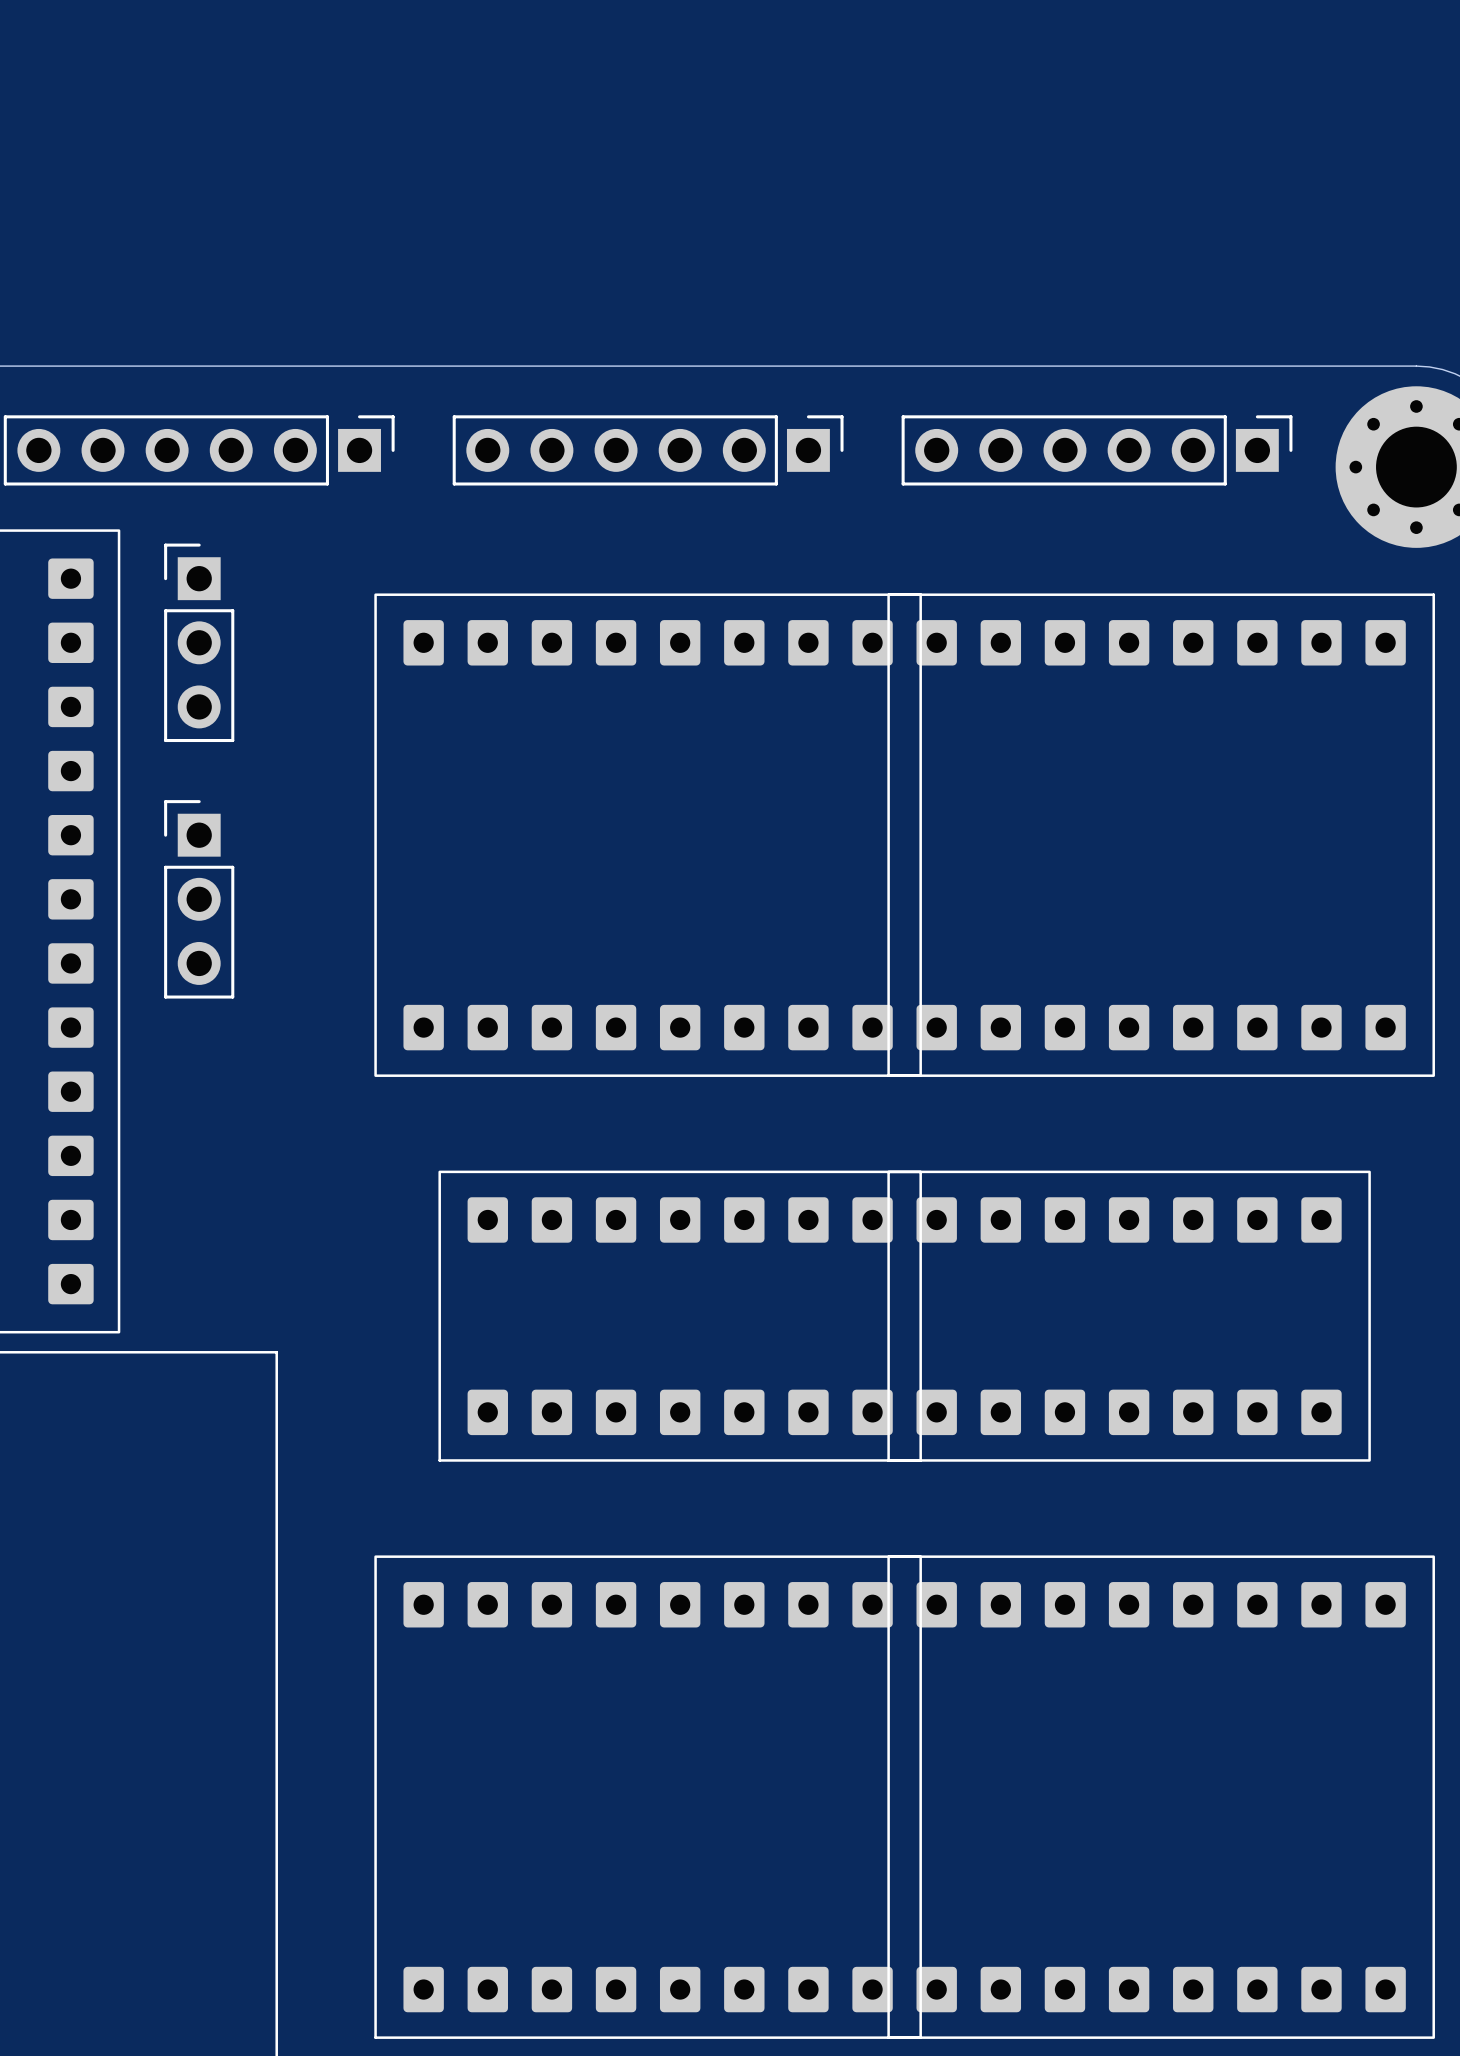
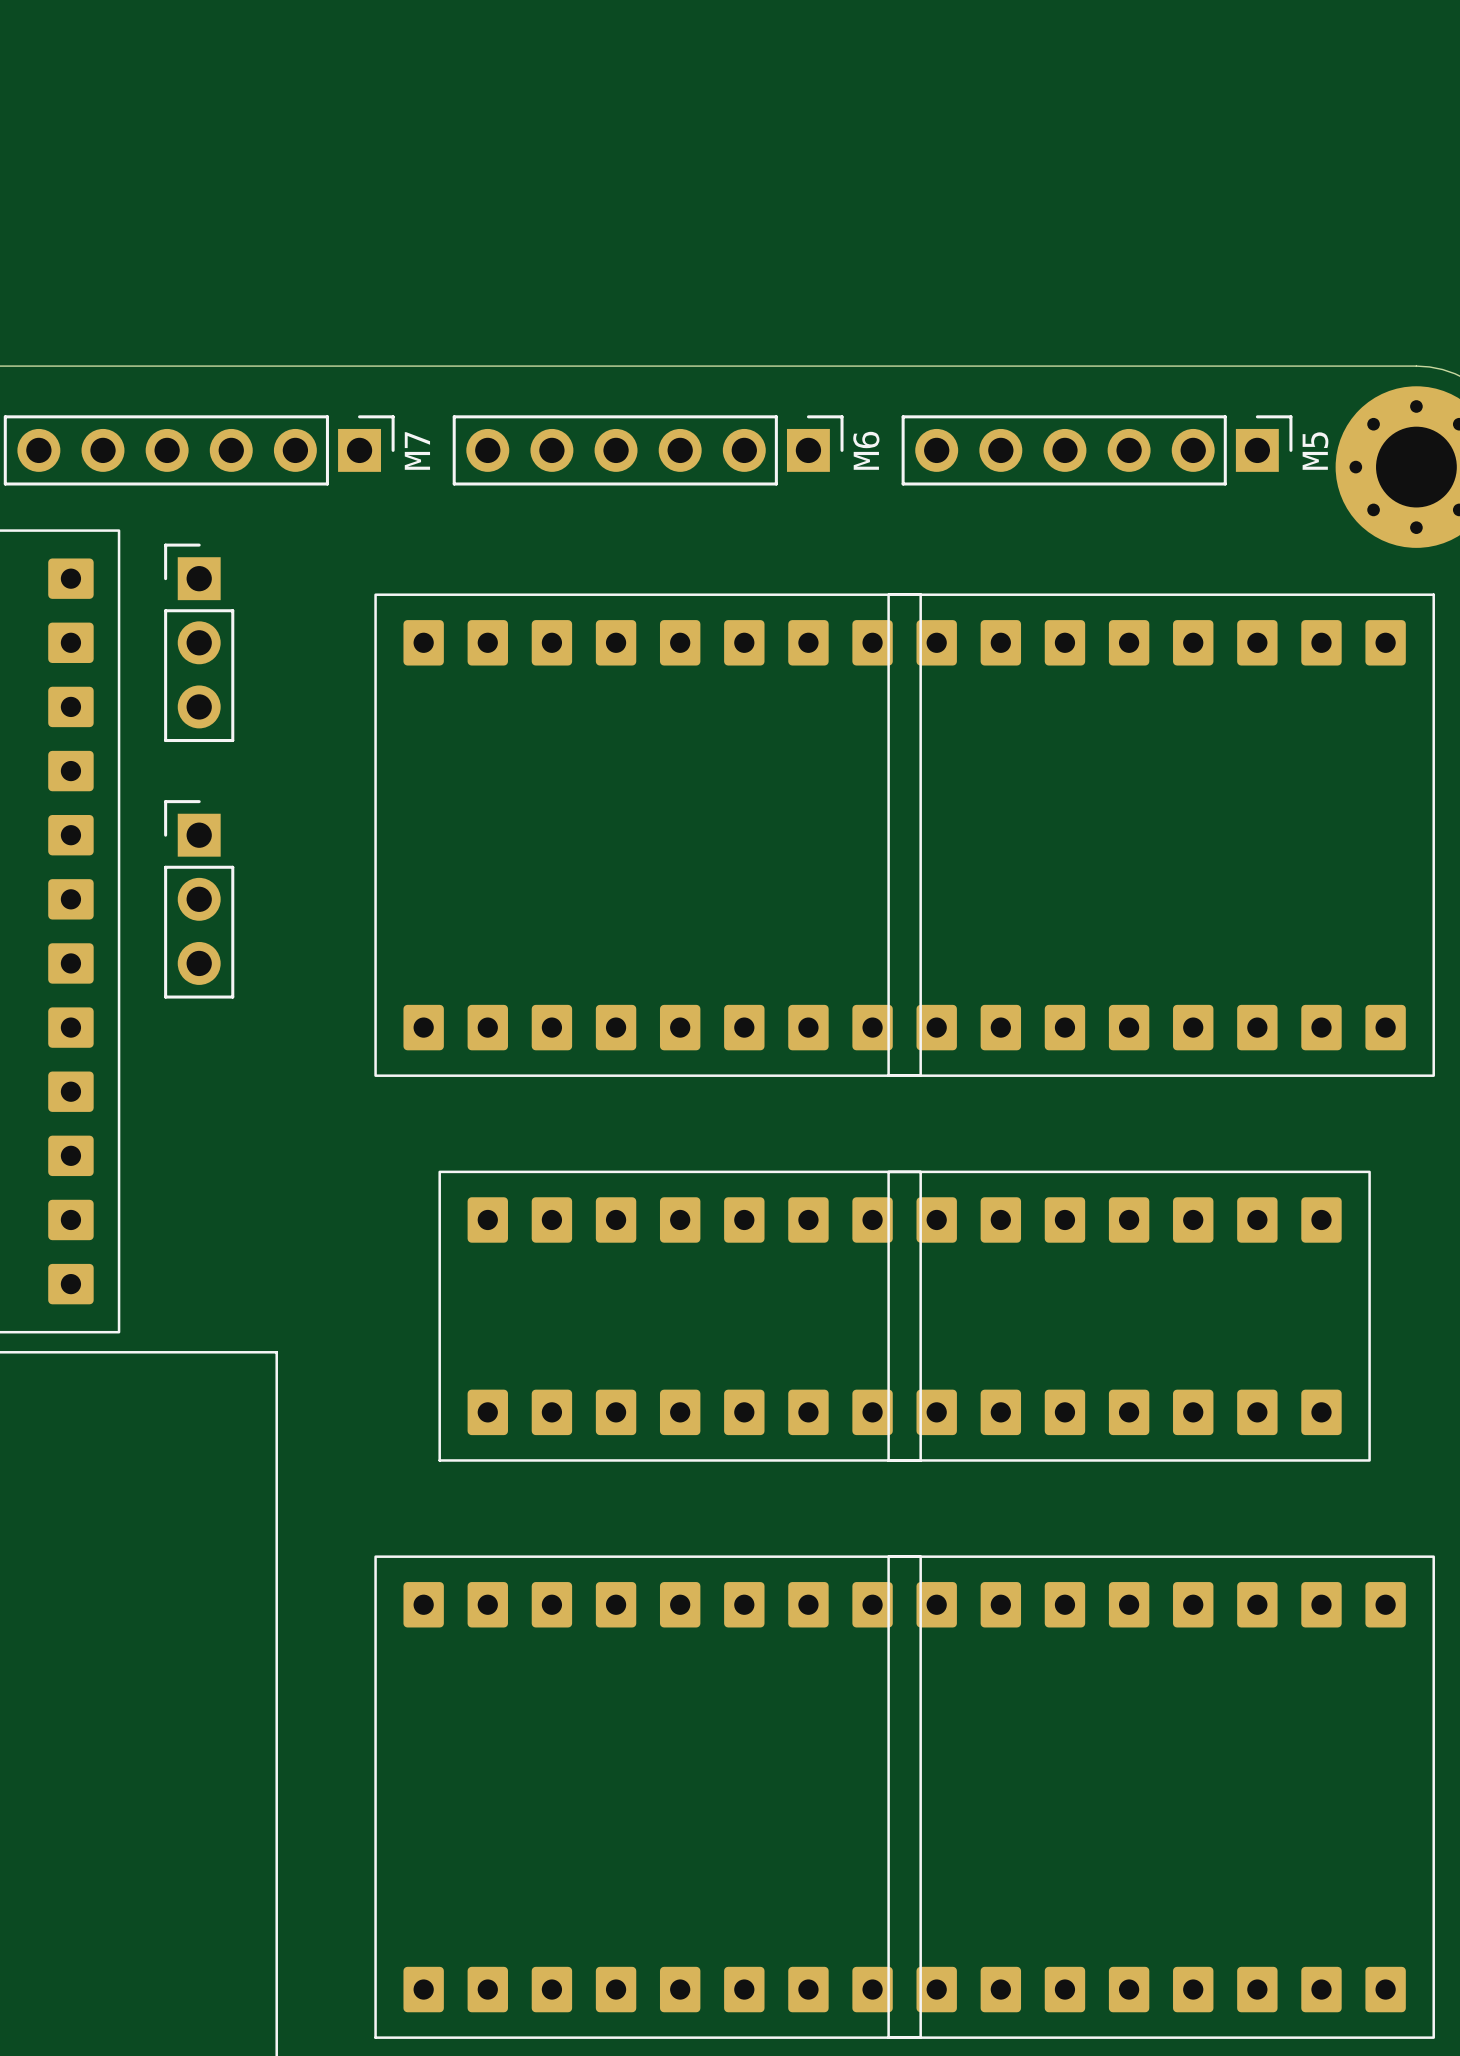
M7 name: none -> M7 (417, 450)
M6 name: none -> M6 (866, 450)
M5 name: none -> M5 (1315, 451)

